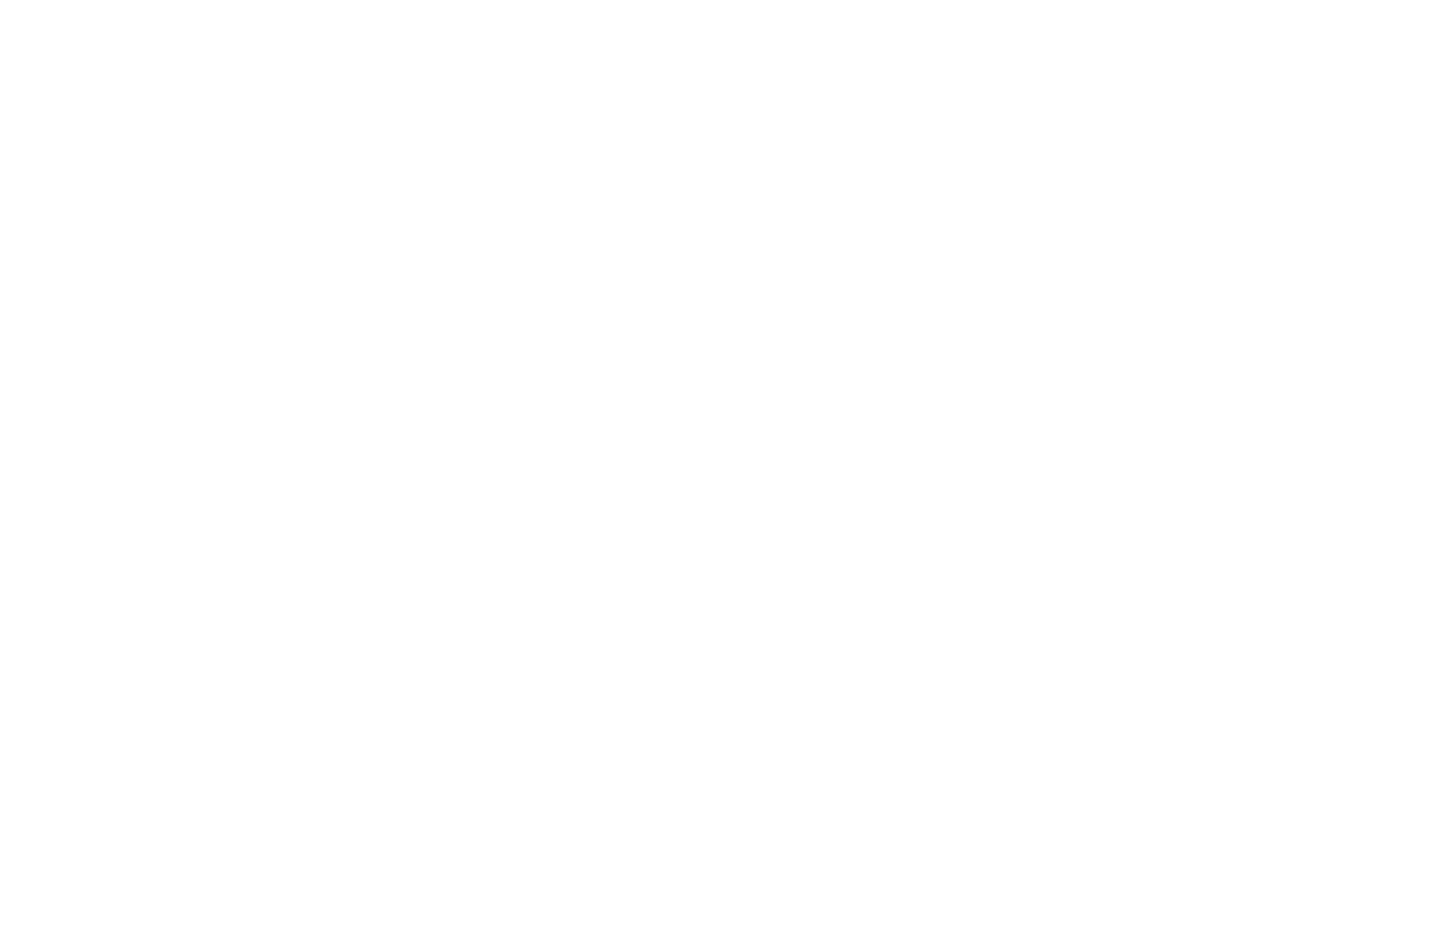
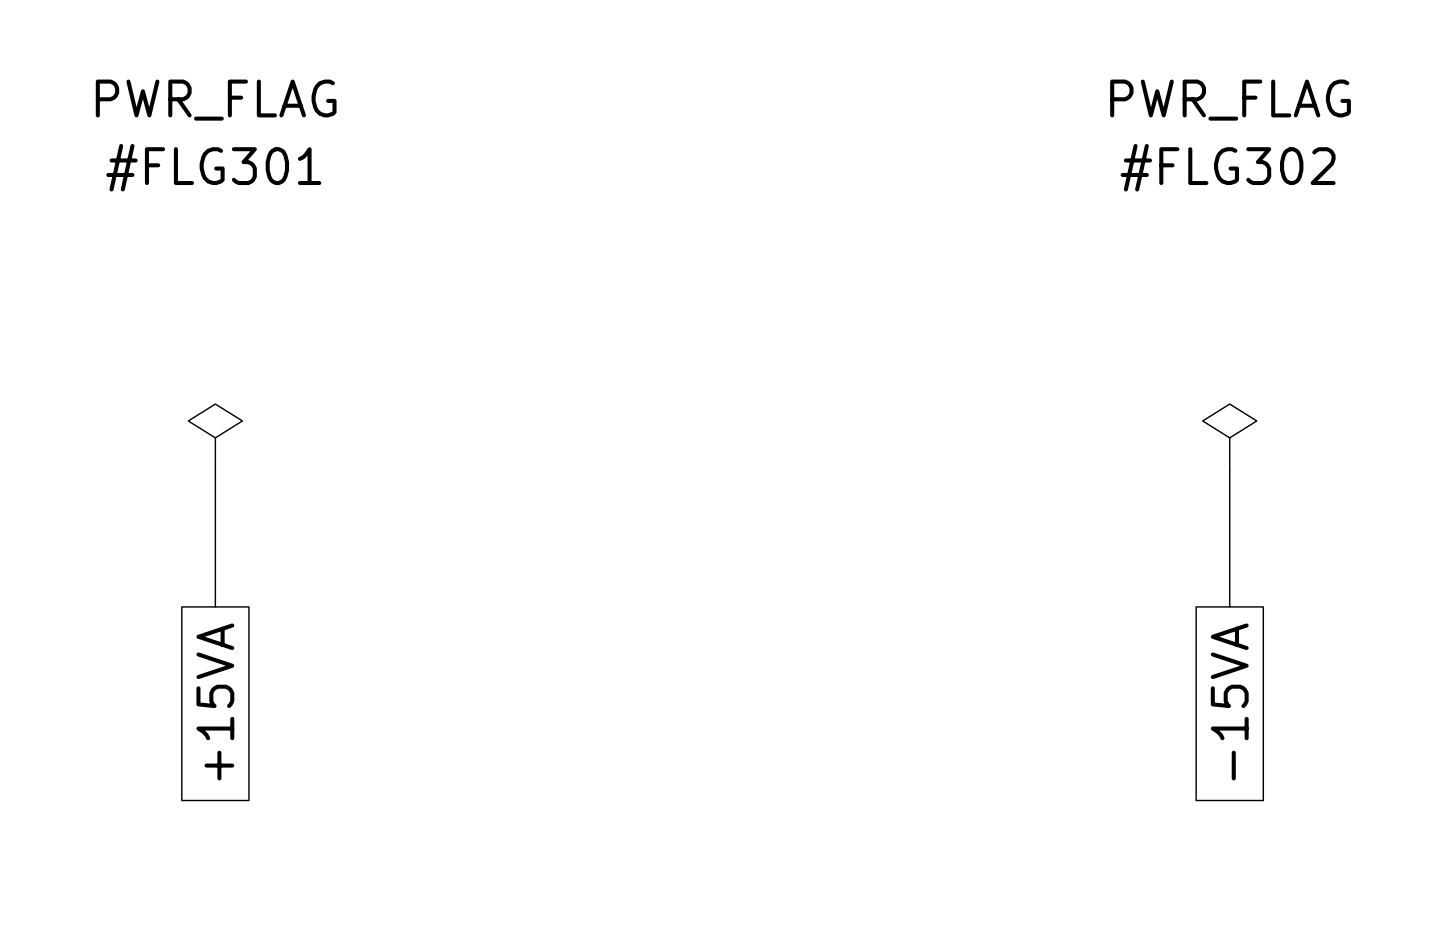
#FLG301: none -> PWR_FLAG (215, 437)
#FLG302: none -> PWR_FLAG (1229, 437)
wire: none -> (215, 471) (215, 606)
wire: none -> (1229, 471) (1229, 606)
global label: none -> +15VA (215, 701)
global label: none -> -15VA (1229, 701)

